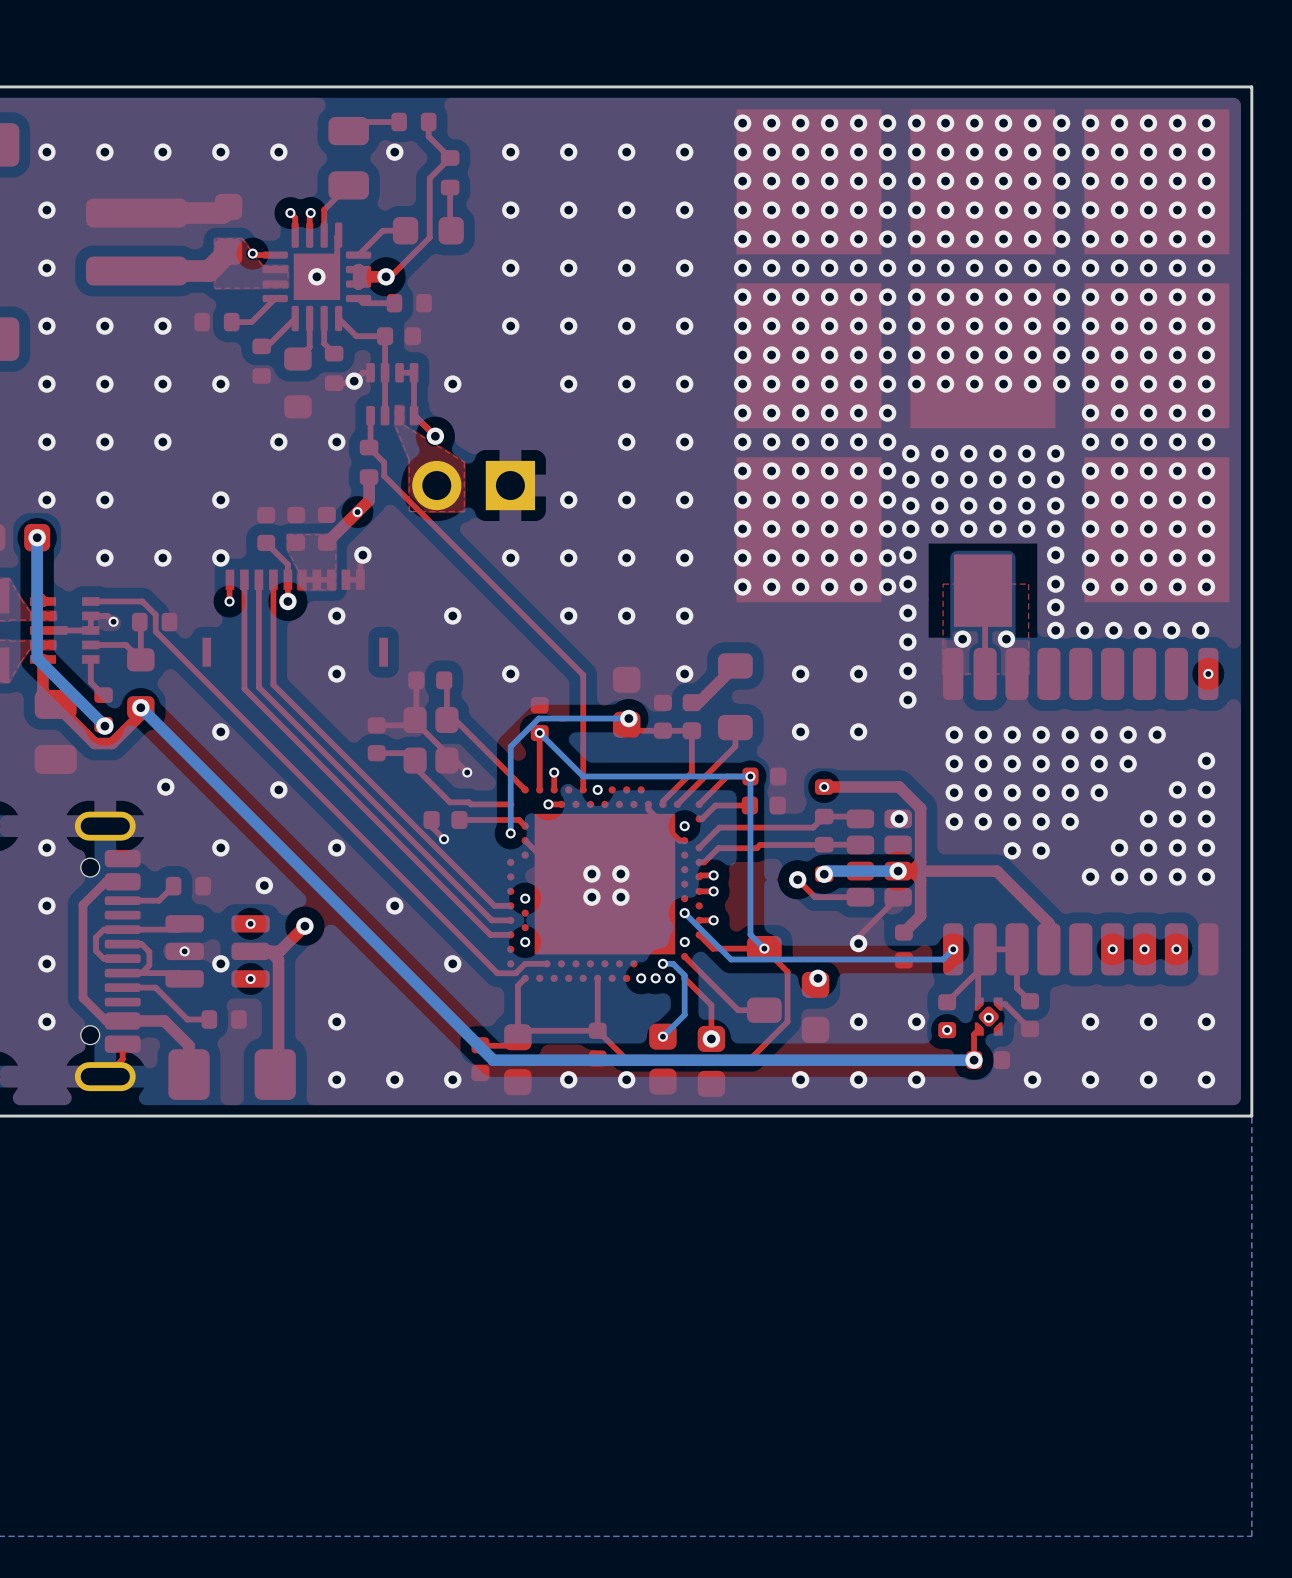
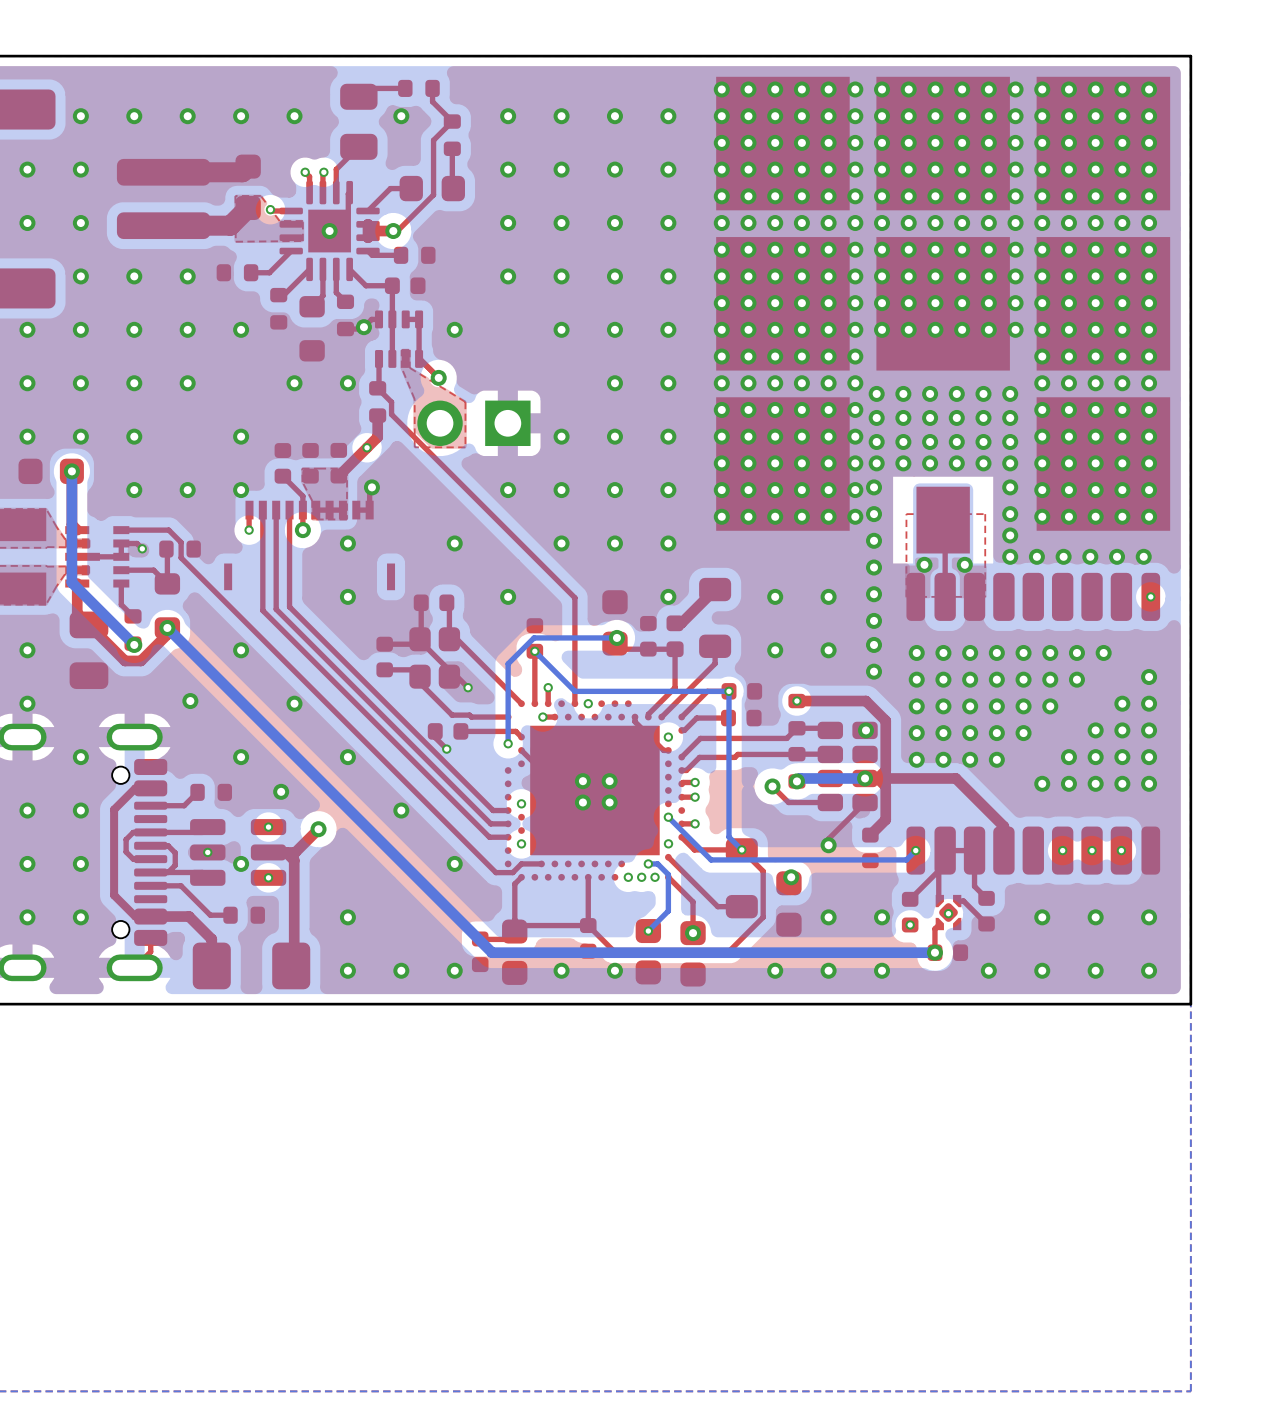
via: none -> (874, 644)
via: none -> (874, 671)
via: none -> (916, 759)
via: none -> (943, 759)

